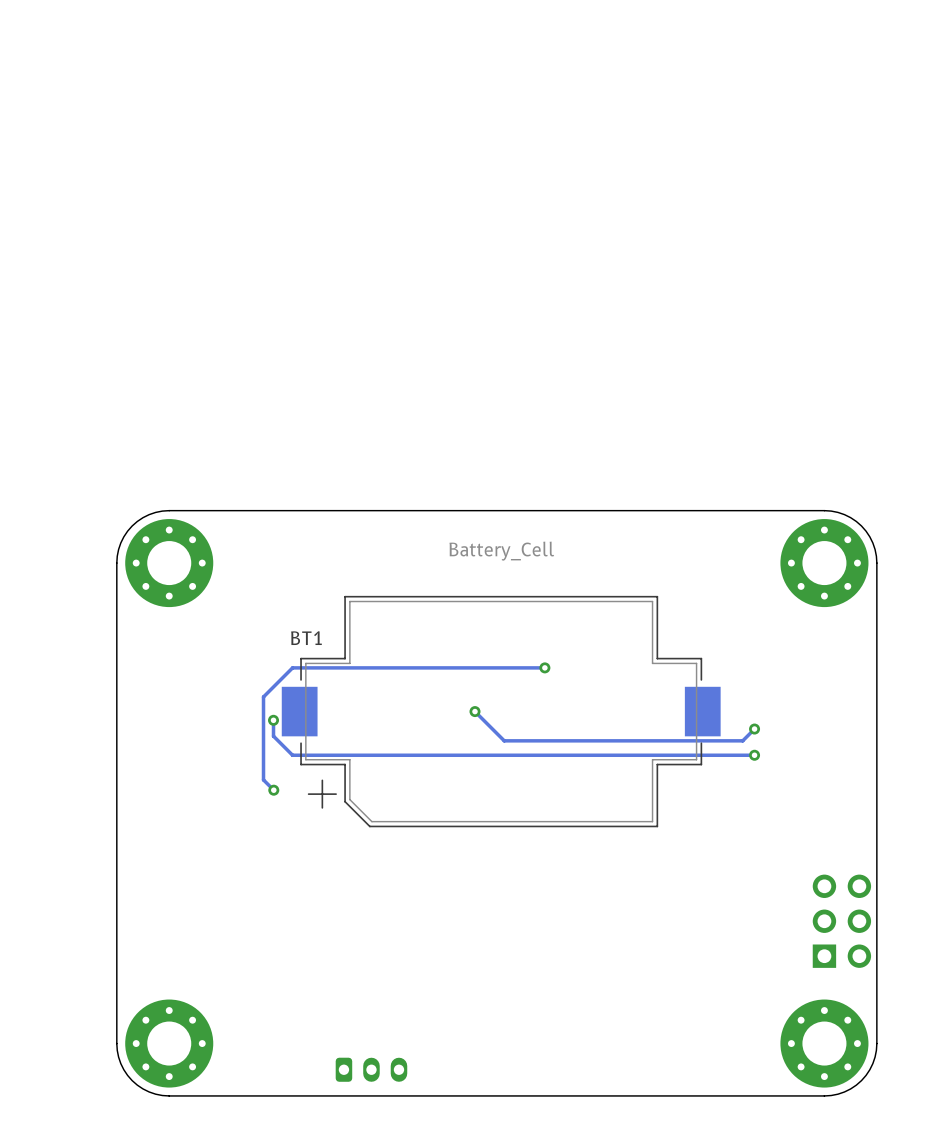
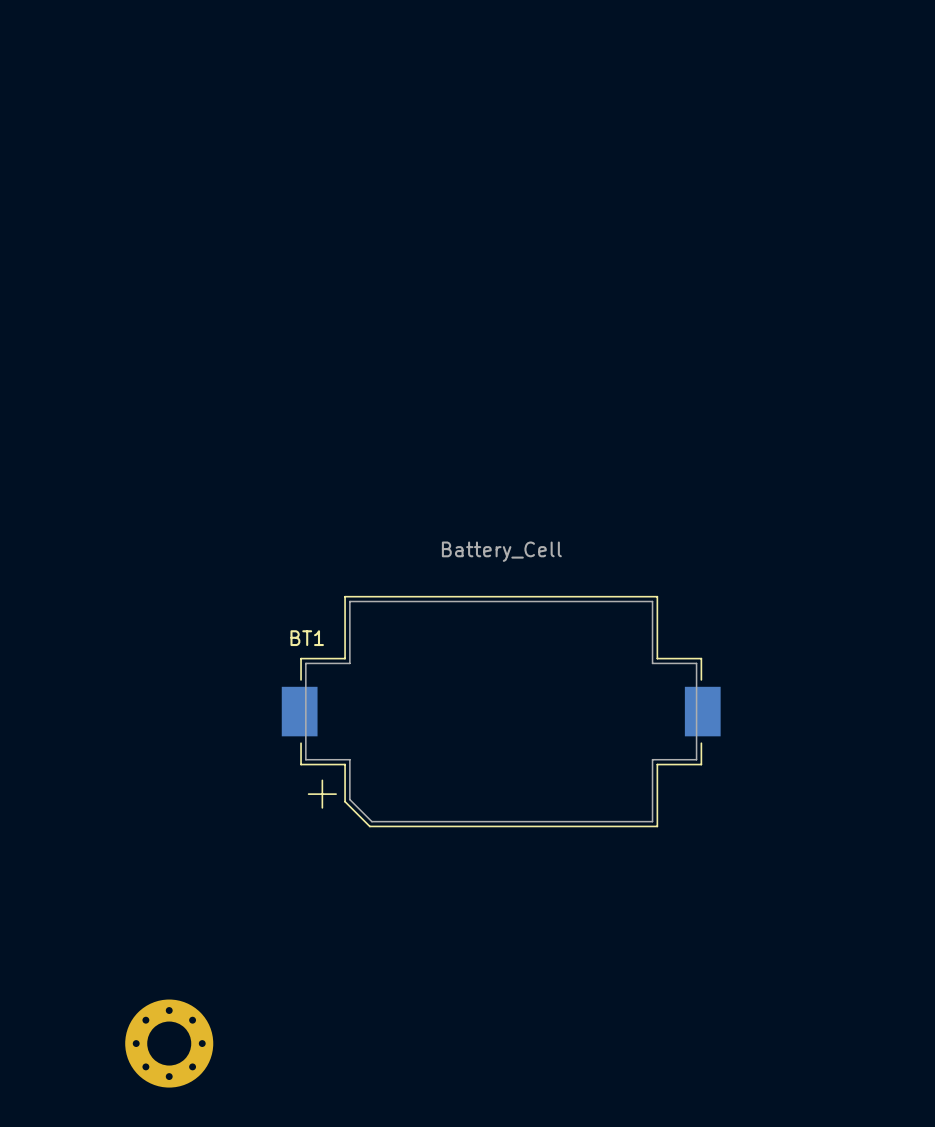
board edge: (824, 510) (169, 510) (149, 514) (137, 521) (123, 536) (118, 549) (116, 563) (116, 1043) (118, 1057) (127, 1075) (137, 1085) (149, 1091) (169, 1095) (824, 1095) (844, 1091) (856, 1085) (866, 1075) (872, 1063) (876, 1043) (876, 563) (872, 543) (861, 525) (844, 514) (824, 510) -> none
part: (169, 563) -> none
part: (824, 563) -> none
track: (544, 667) (292, 667) (263, 696) (263, 779) (273, 790) -> none
via: (544, 667) -> none
track: (474, 711) (504, 740) (742, 740) (754, 729) -> none
via: (474, 711) -> none
track: (273, 720) (273, 736) (292, 755) (754, 755) -> none
via: (273, 720) -> none
via: (754, 729) -> none
via: (754, 755) -> none
via: (273, 790) -> none
part: (841, 921) -> none
part: (824, 1043) -> none
part: (371, 1069) -> none

